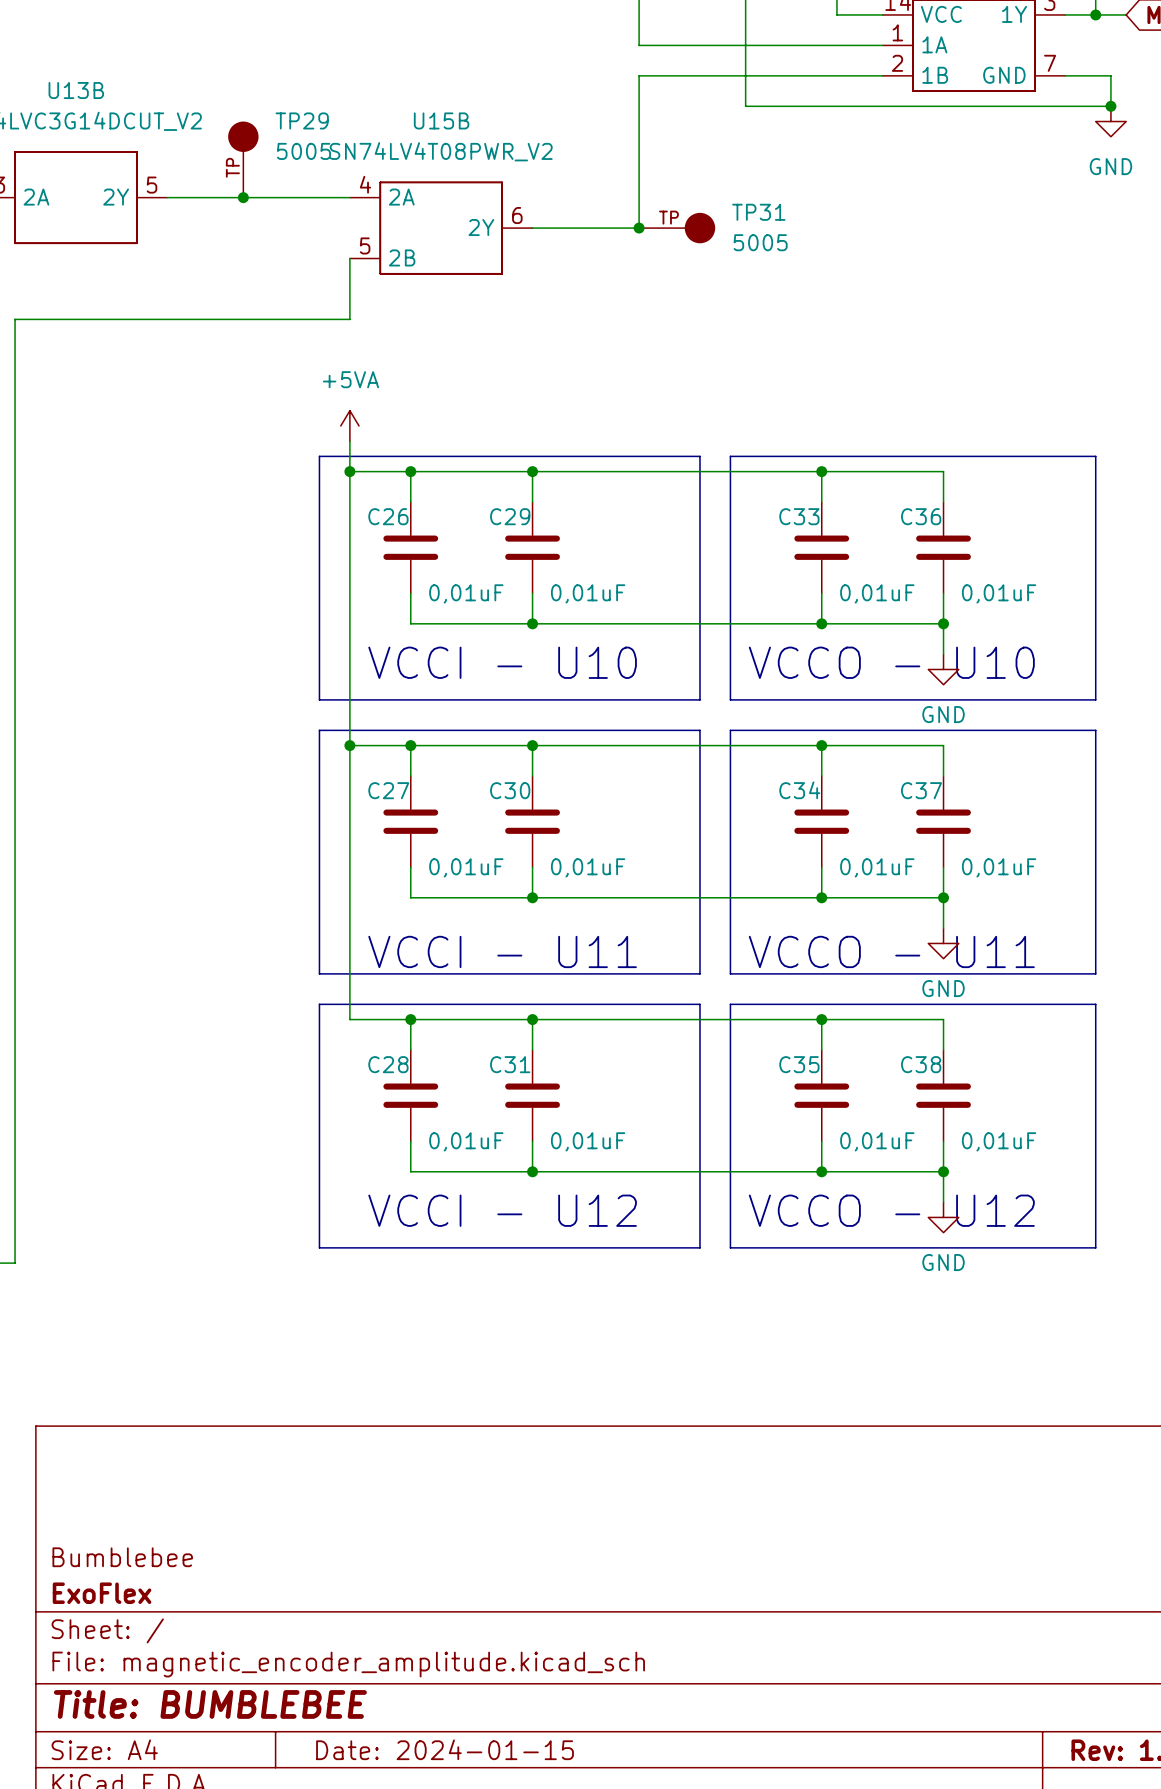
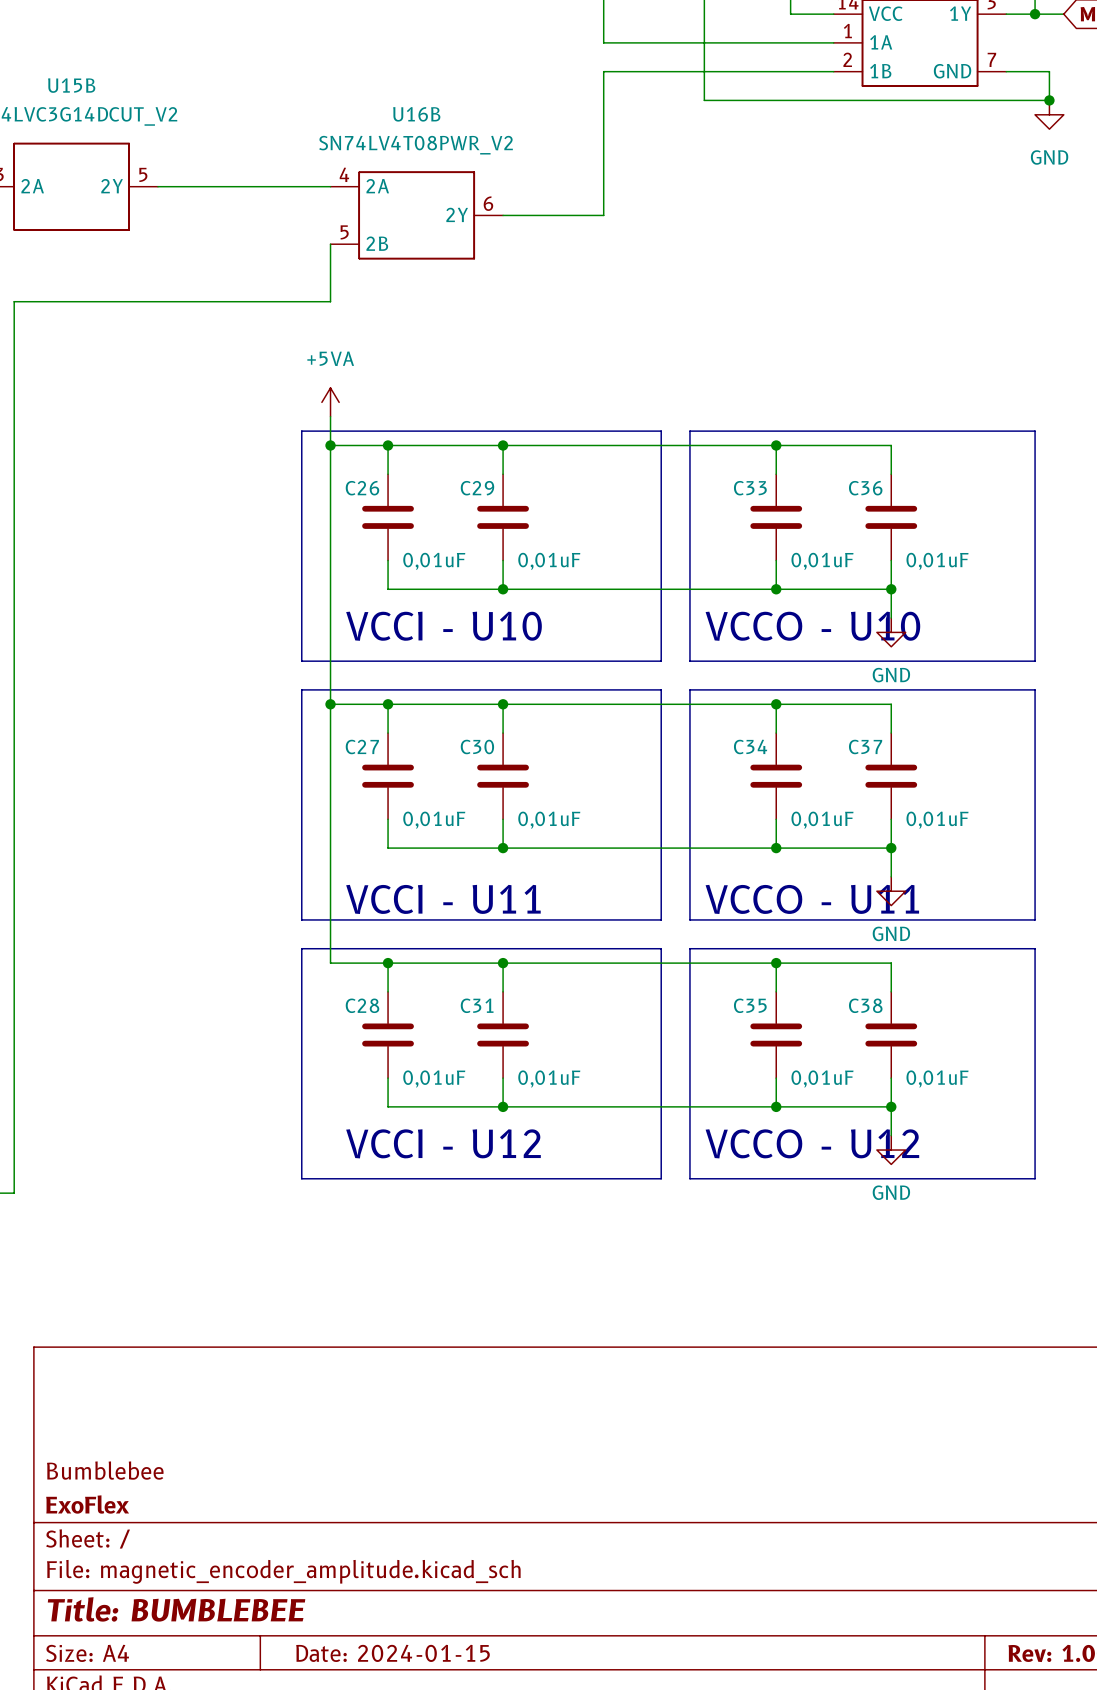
U13B name: U13B (76, 90) -> U15B (71, 85)
U15B name: U15B (441, 120) -> U16B (416, 114)
TP29: 5005 (243, 159) -> none
junction: (243, 197) -> none
junction: (639, 228) -> none
TP31: 5005 (677, 228) -> none

